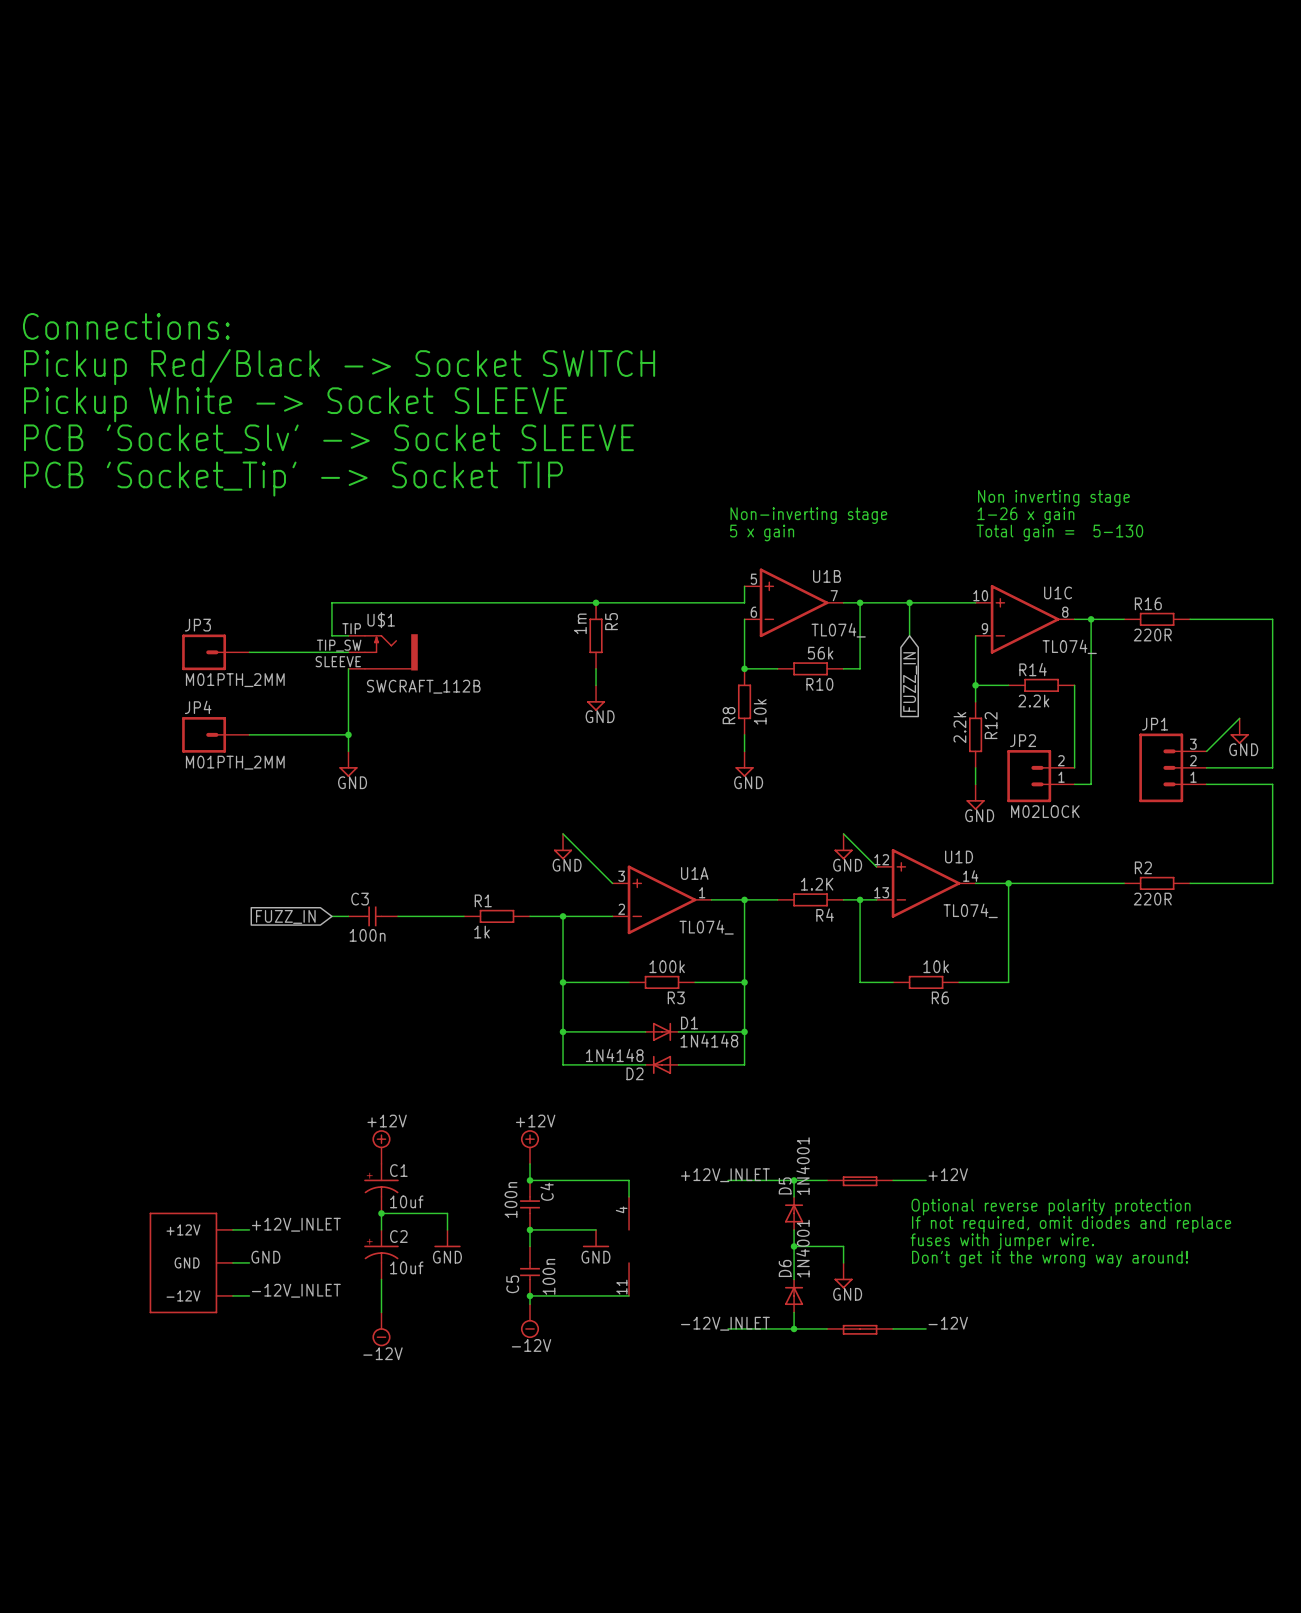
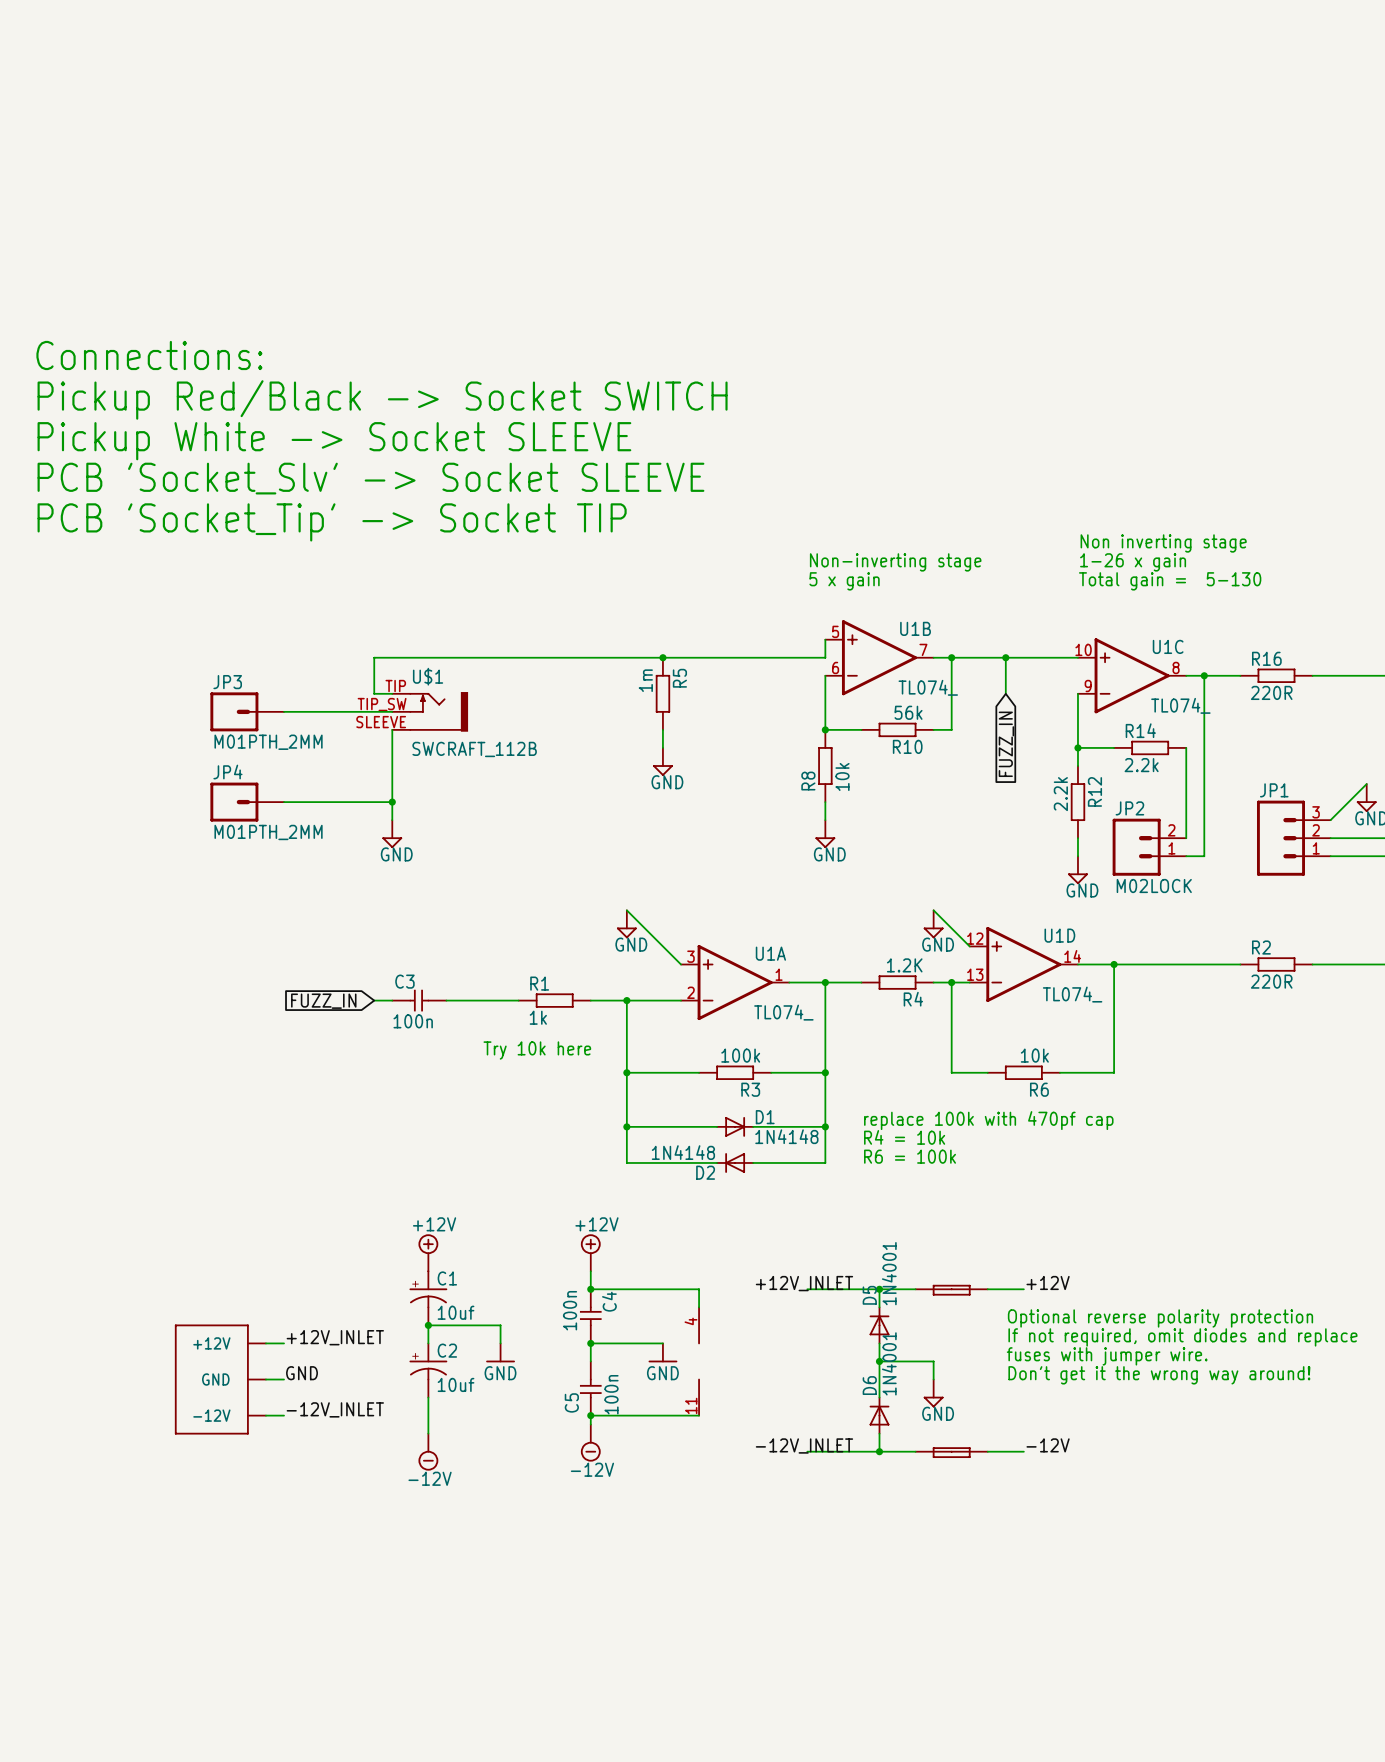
text: none -> Try 10k here (537, 1050)
text: none -> replace 100k with 470pf cap (988, 1120)
text: none -> R4 = 10k (904, 1137)
text: none -> R6 = 100k (910, 1156)

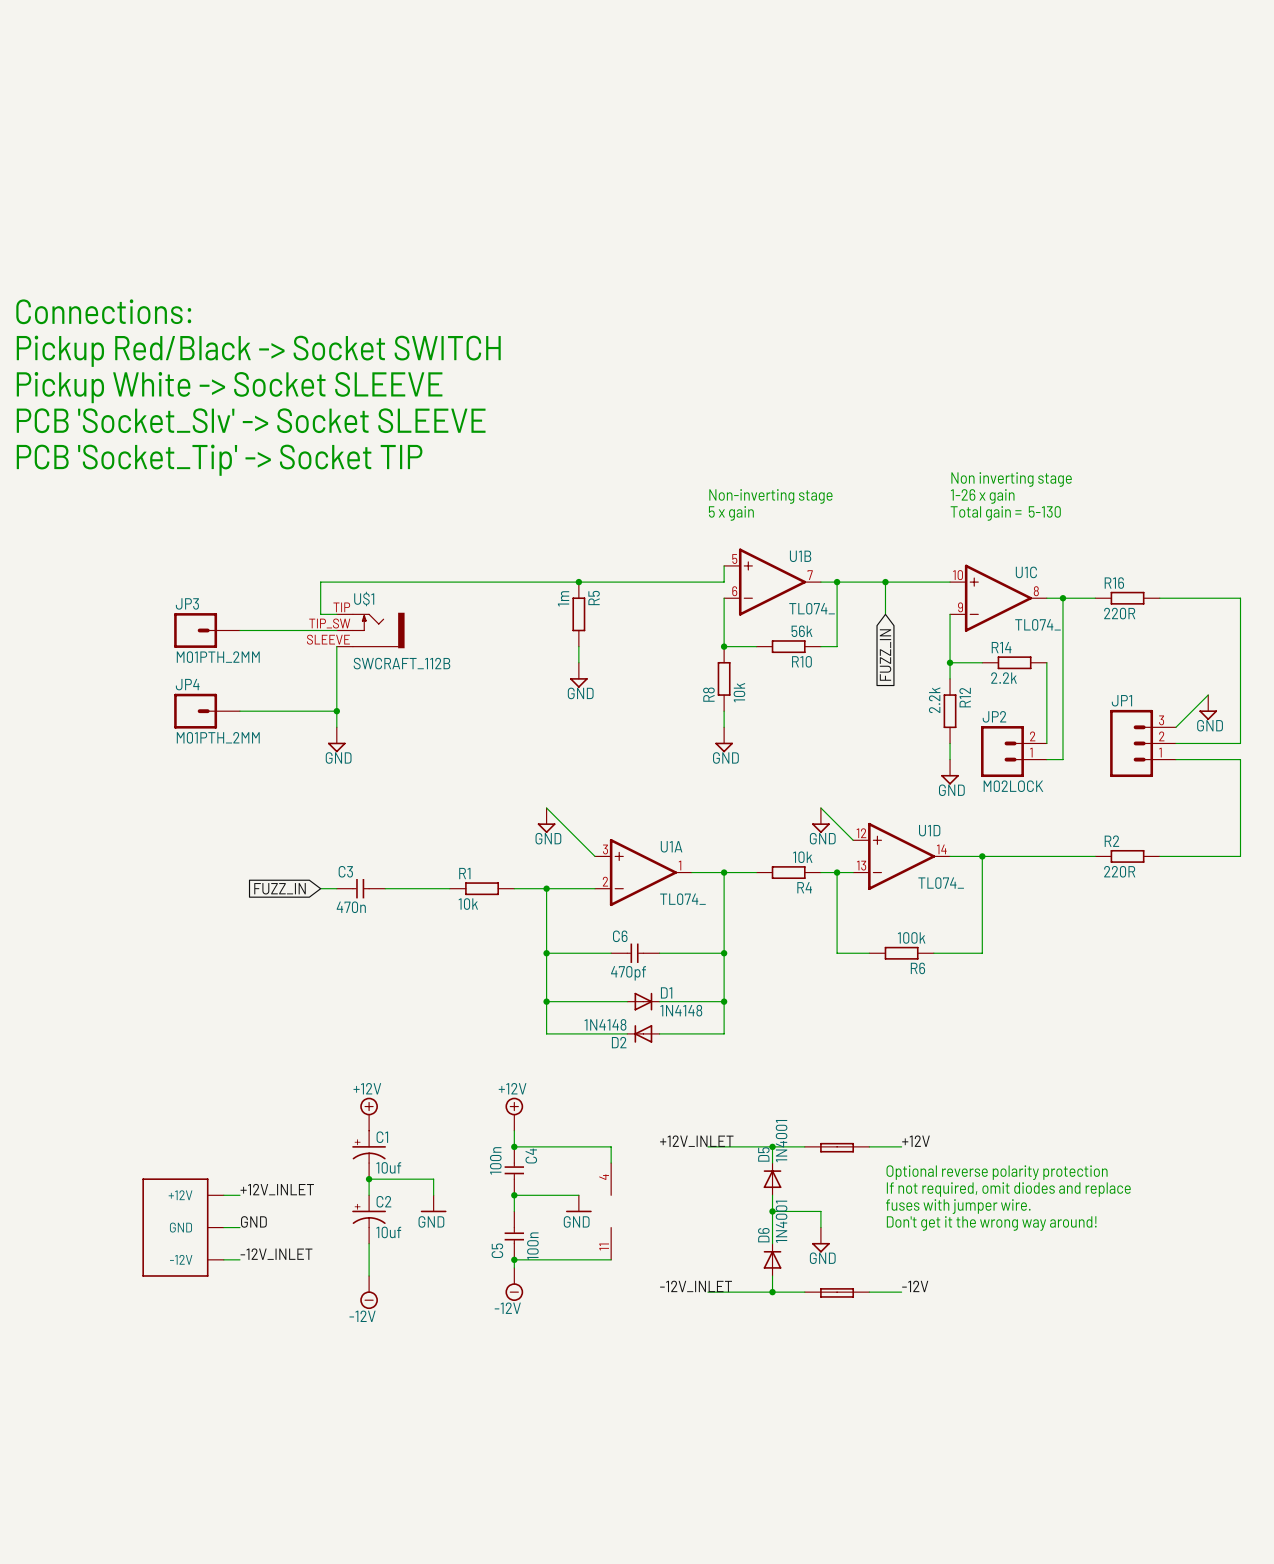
R4 value: 1.2K (904, 965) -> 10k (802, 857)
R1 value: 1k (538, 1017) -> 10k (468, 904)
C3 value: 100n (413, 1021) -> 470n (351, 907)
text: Try 10k here (537, 1050) -> none
R6 value: 10k (1034, 1055) -> 100k (911, 937)
C6: none -> 470pf (635, 953)
R3: 100k (735, 1072) -> none
text: replace 100k with 470pf cap (988, 1120) -> none
text: R4 = 10k (904, 1137) -> none
text: R6 = 100k (910, 1156) -> none

